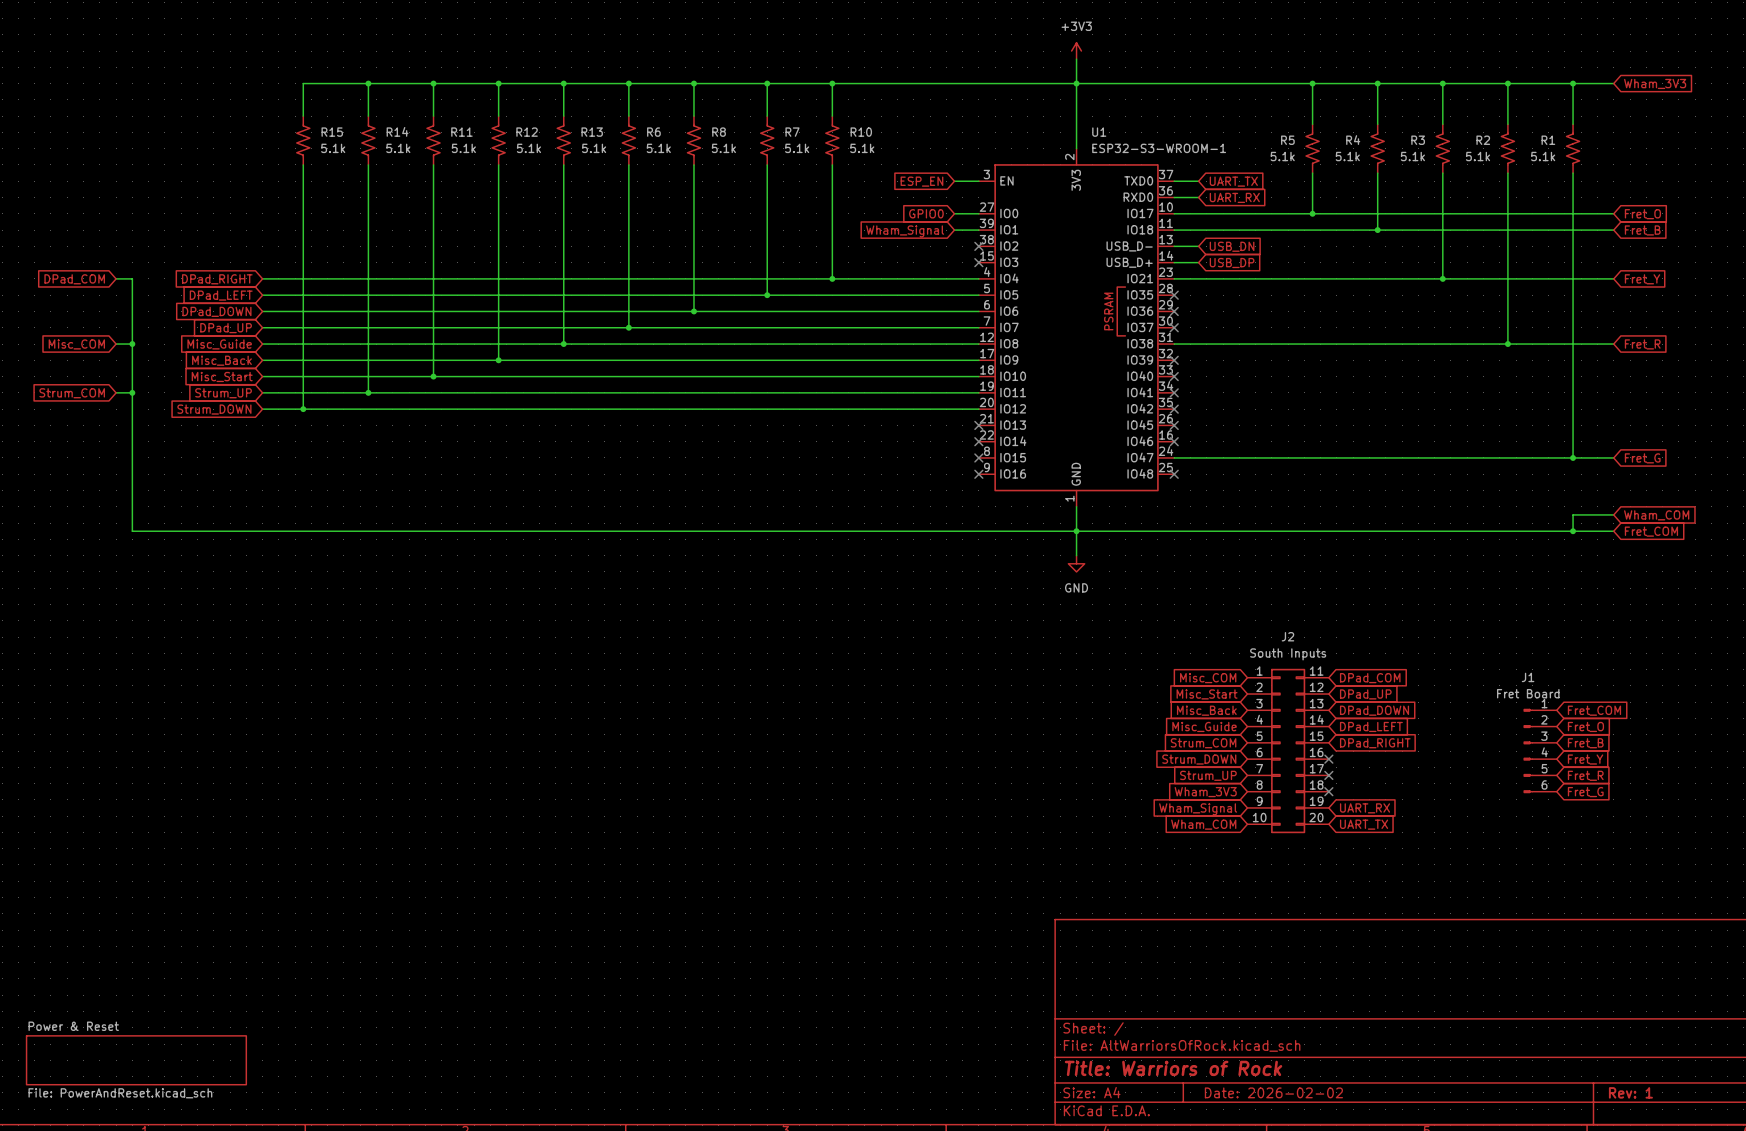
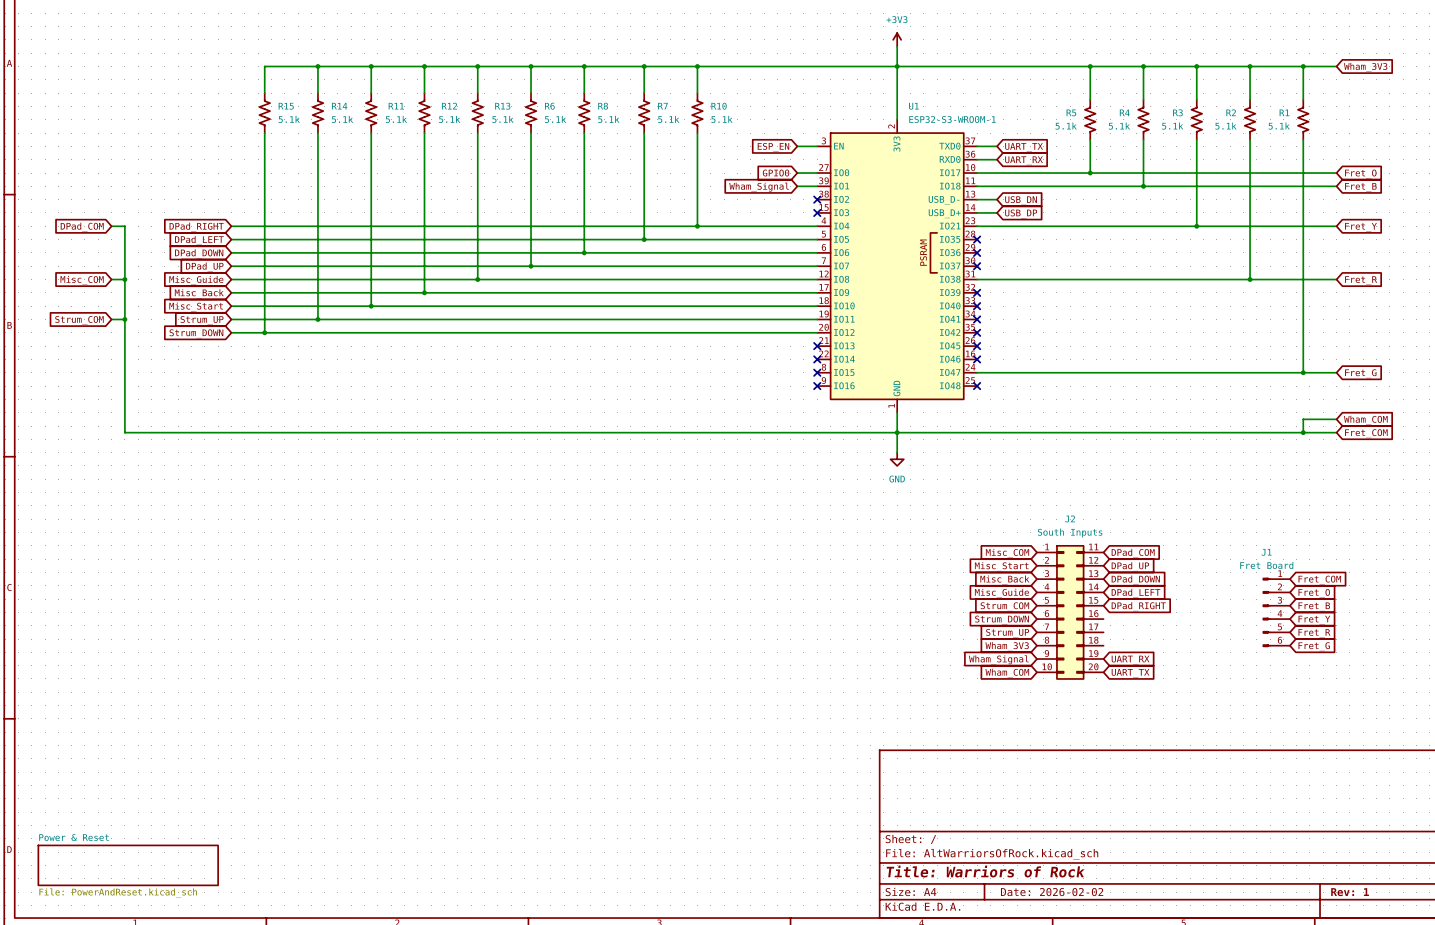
no-connect mark: (1328, 759) -> none
no-connect mark: (1328, 775) -> none
no-connect mark: (1328, 791) -> none

